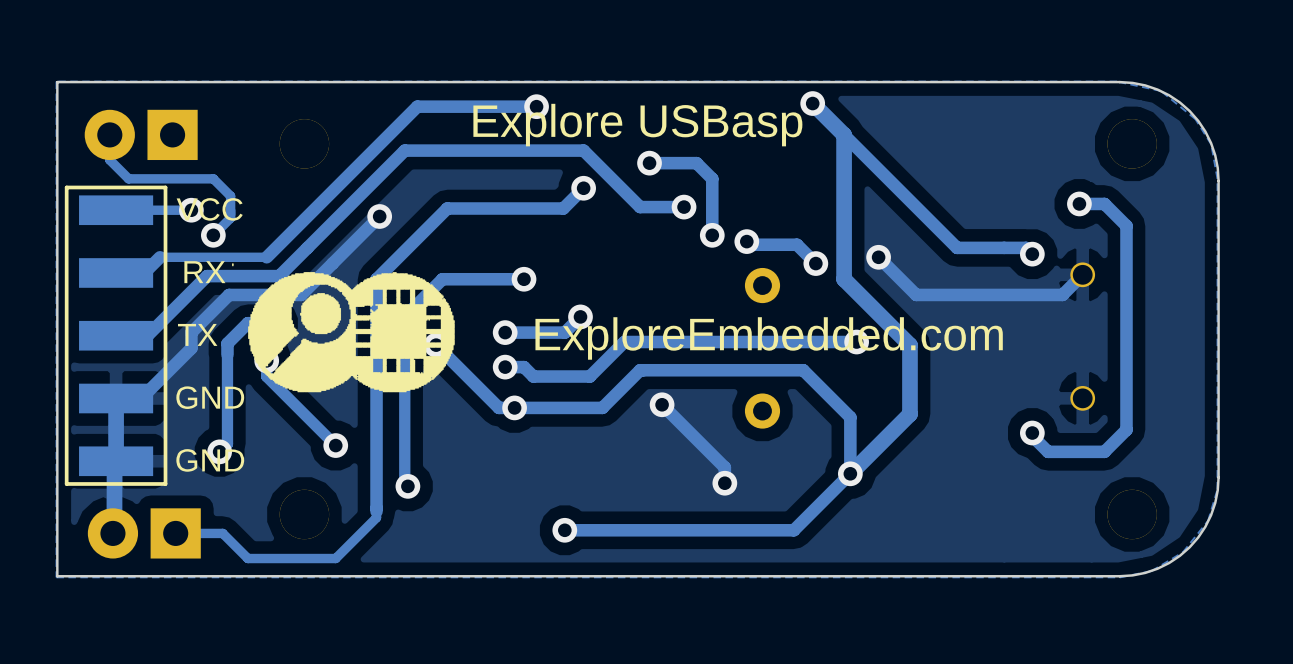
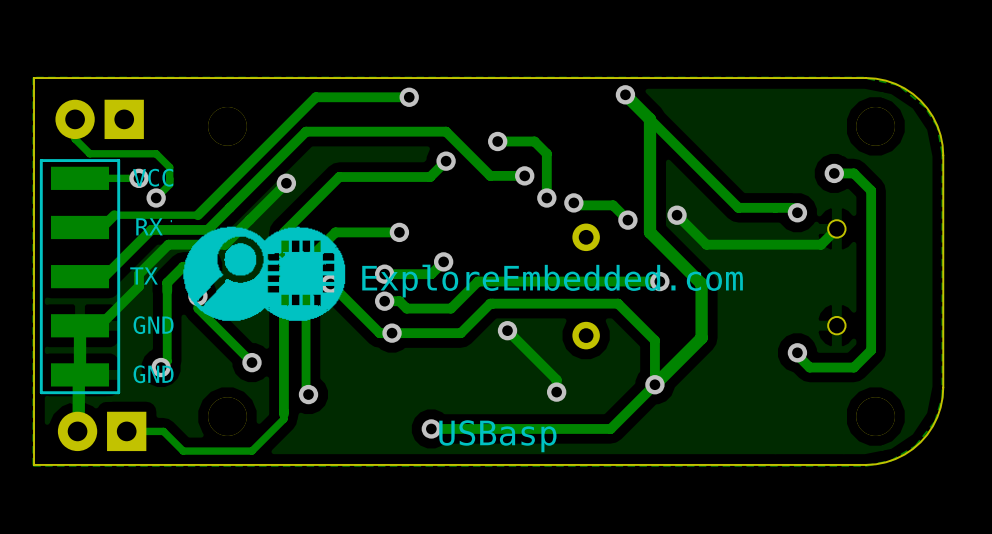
text: Explore USBasp (637, 125) -> none
text position: ExploreEmbedded.com (769, 338) -> ExploreEmbedded.com (552, 281)
text: none -> USBasp (497, 436)

